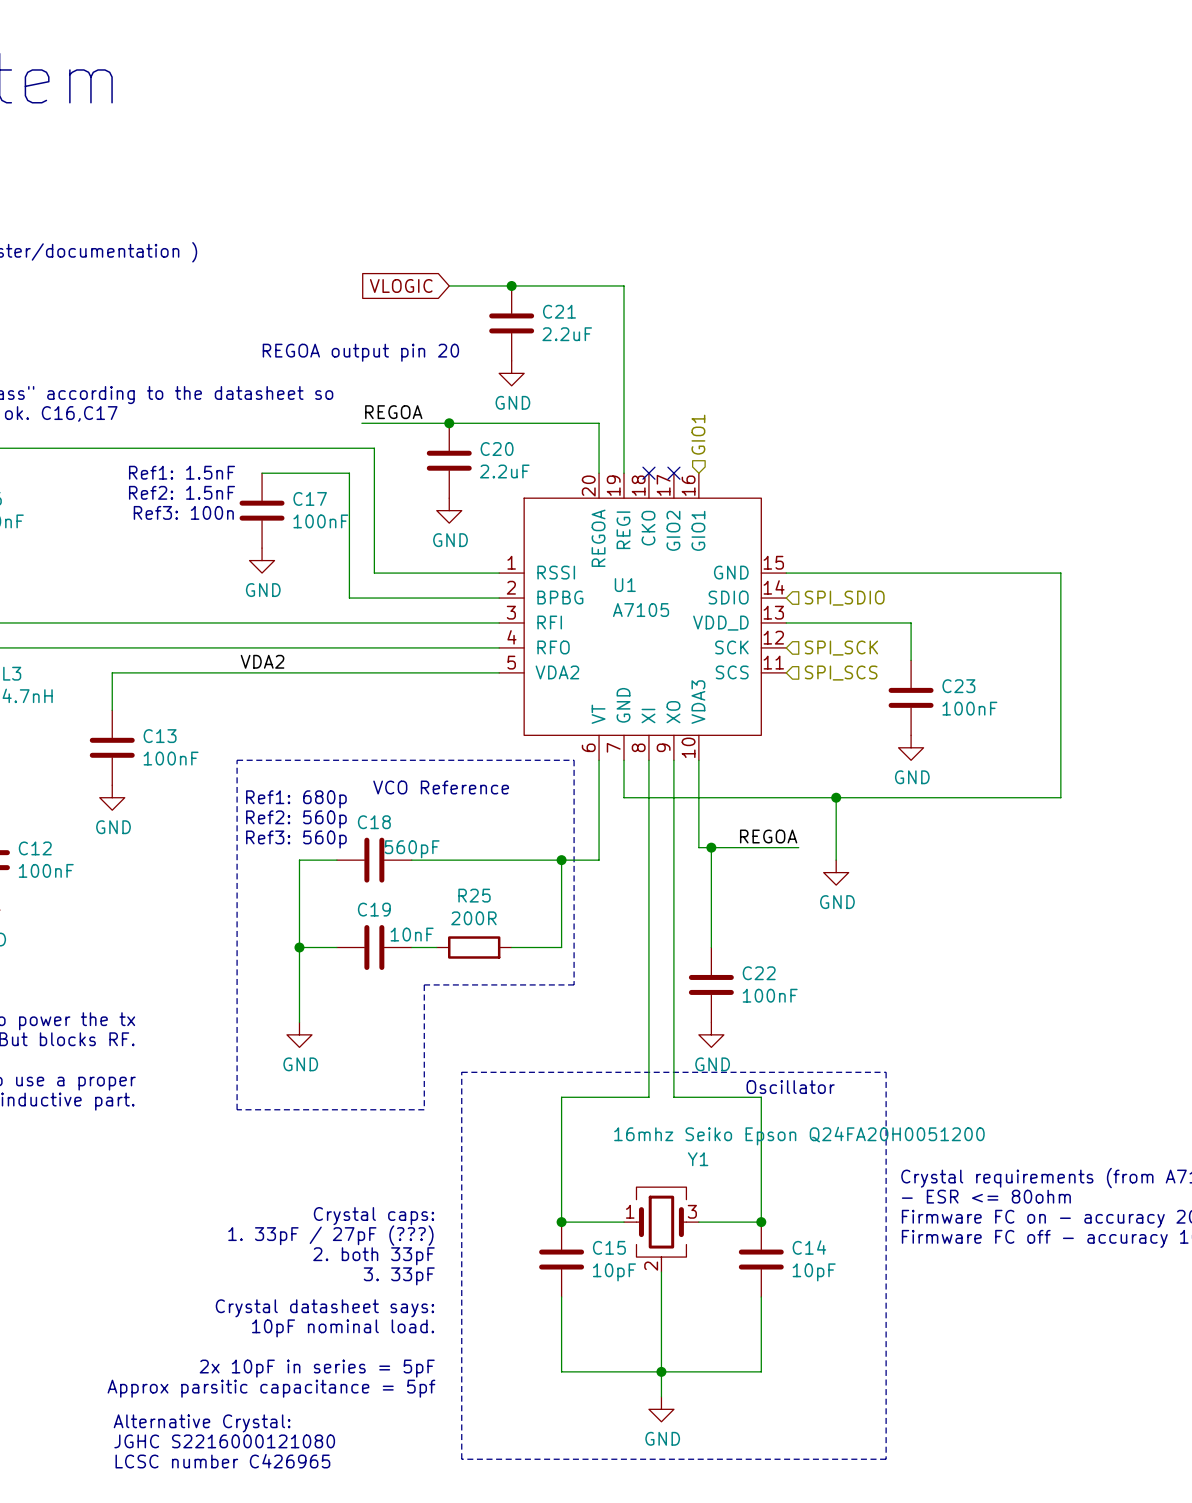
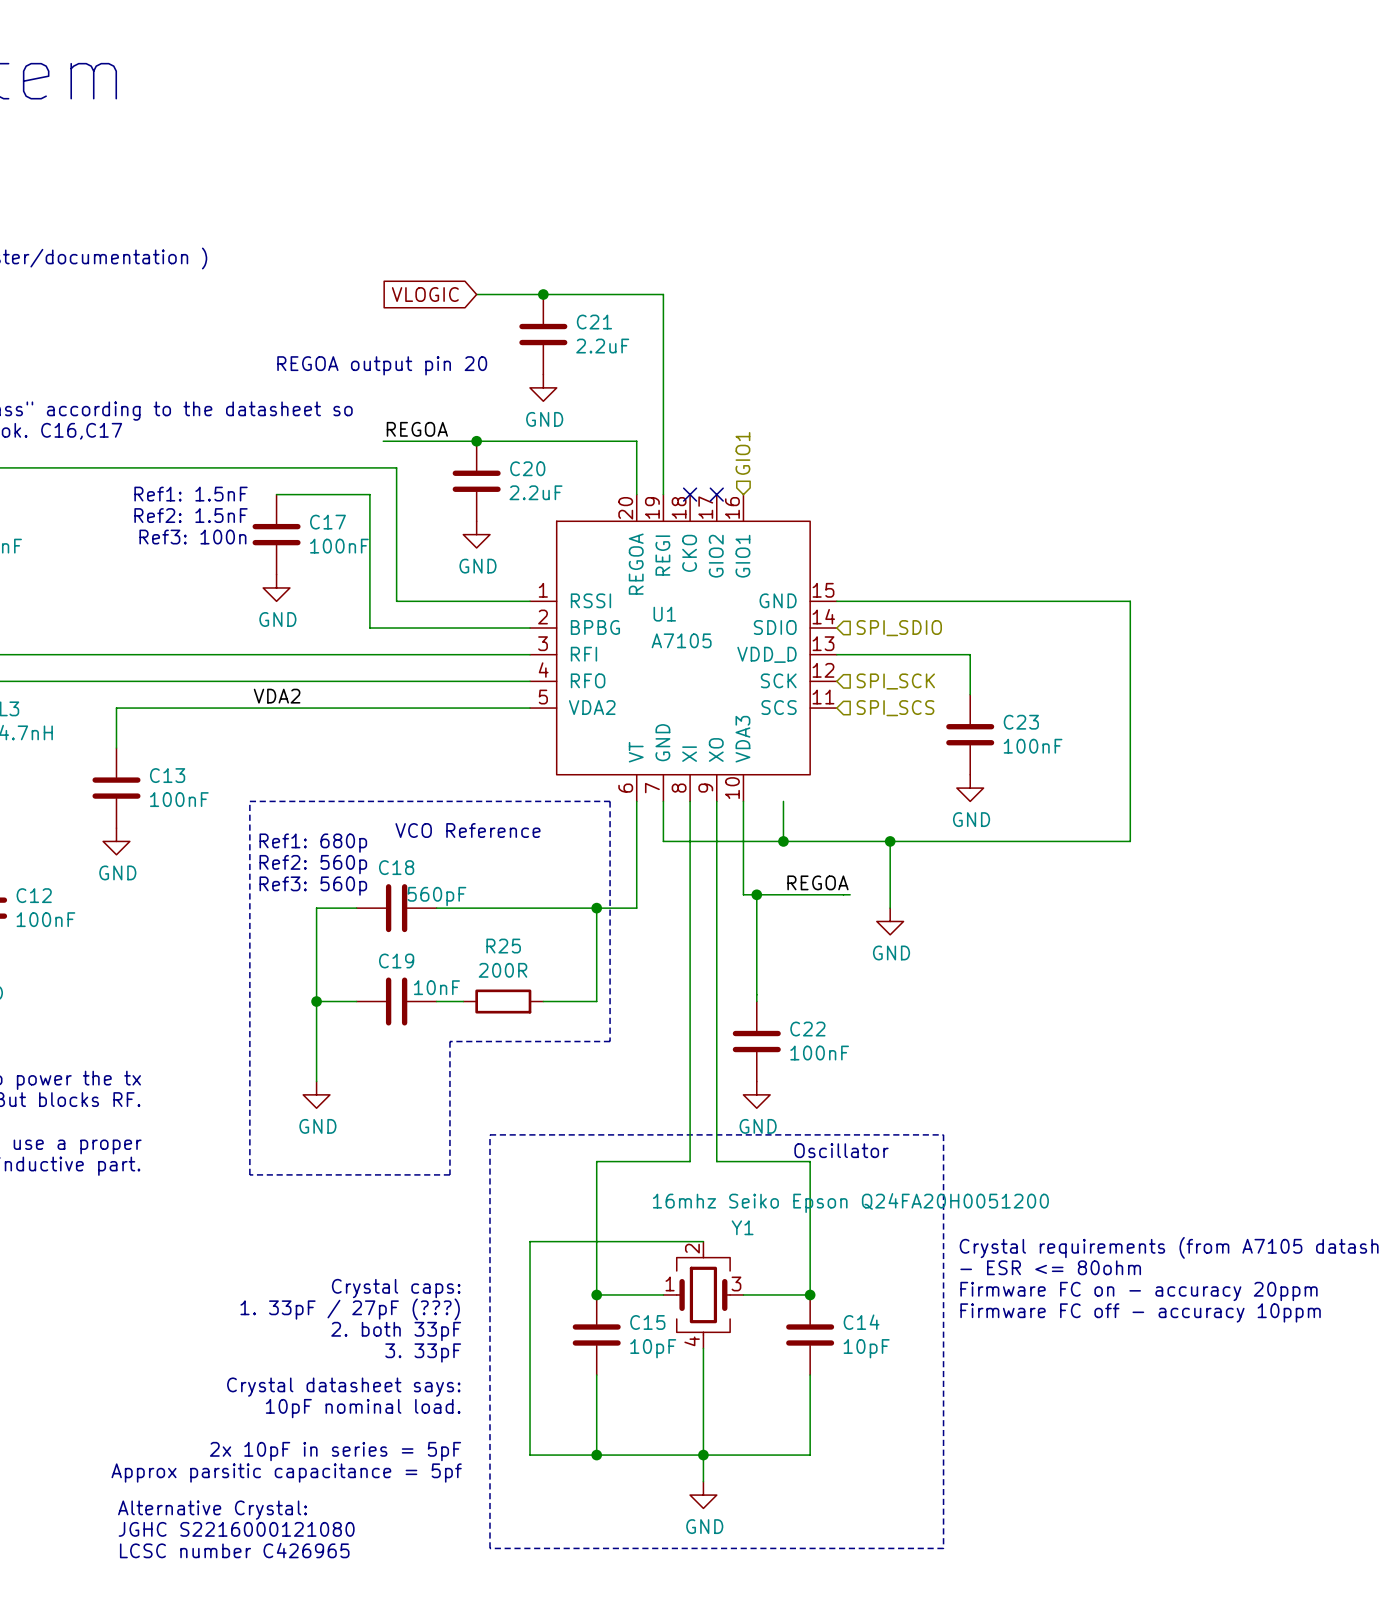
wire: none -> (783, 801) (783, 841)
junction: none -> (783, 841)
wire: none -> (703, 1241) (530, 1241) (530, 1455) (596, 1455)
Y1 symbol: [624, 1187, 699, 1273] -> [663, 1241, 744, 1349]
junction: none -> (596, 1455)

